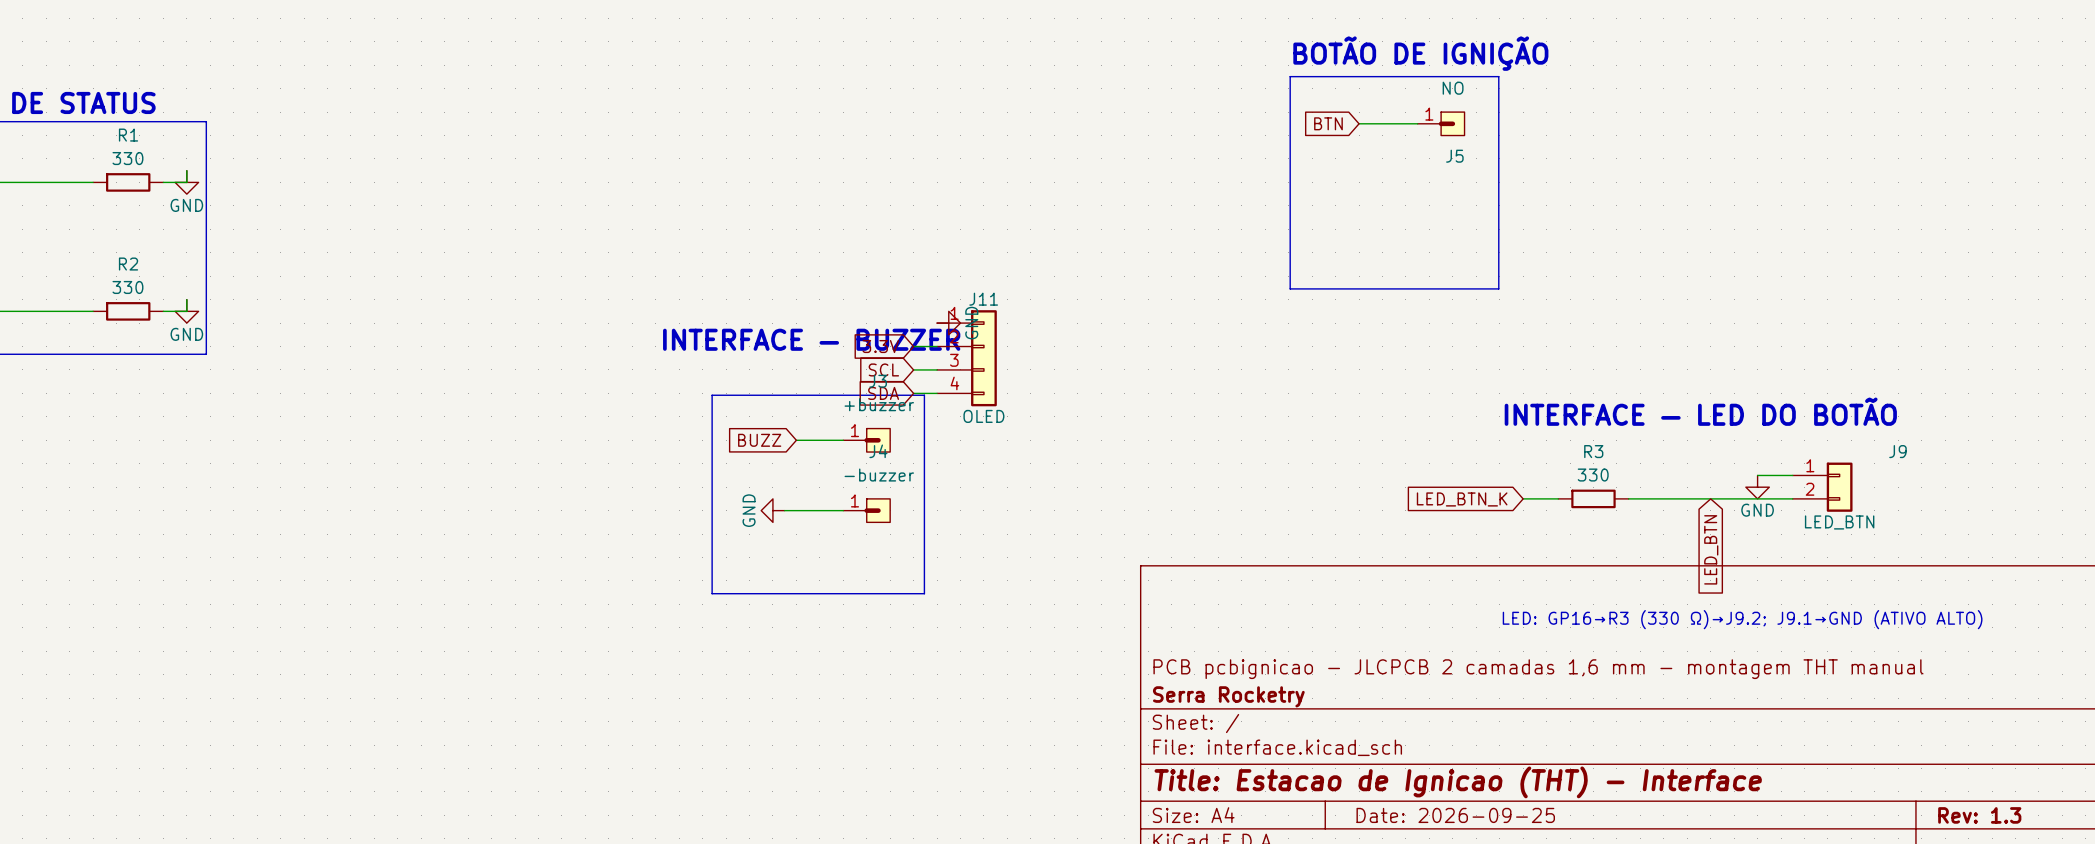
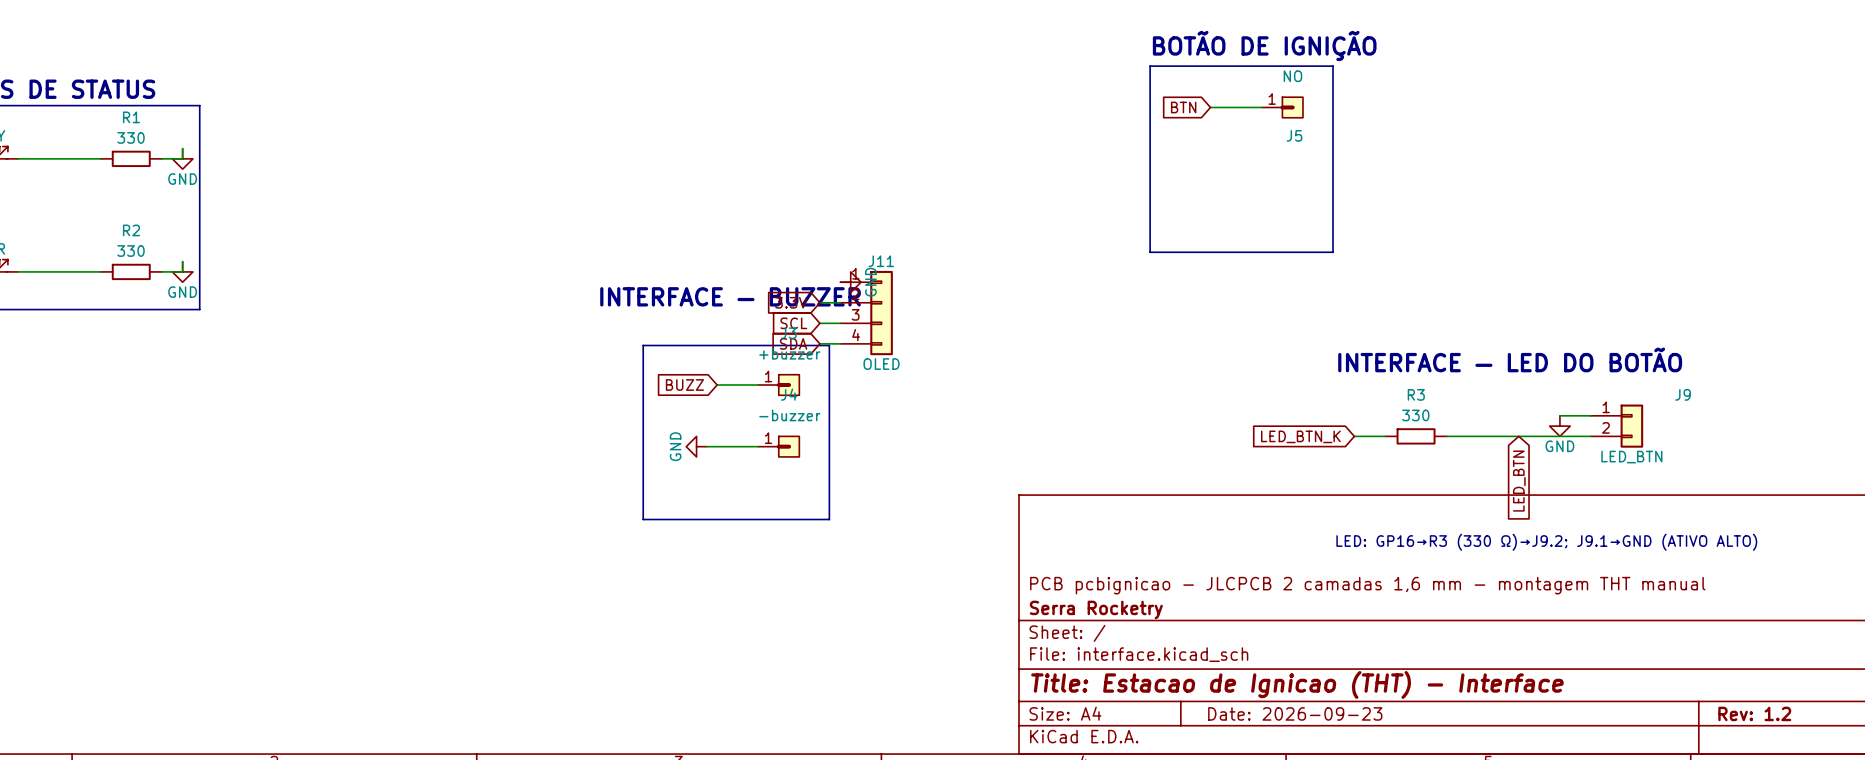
title block: Date: 2026-09-25 (1455, 815) -> Date: 2026-09-23 (1295, 713)
title block: Rev: 1.3 (1979, 815) -> Rev: 1.2 (1754, 713)

